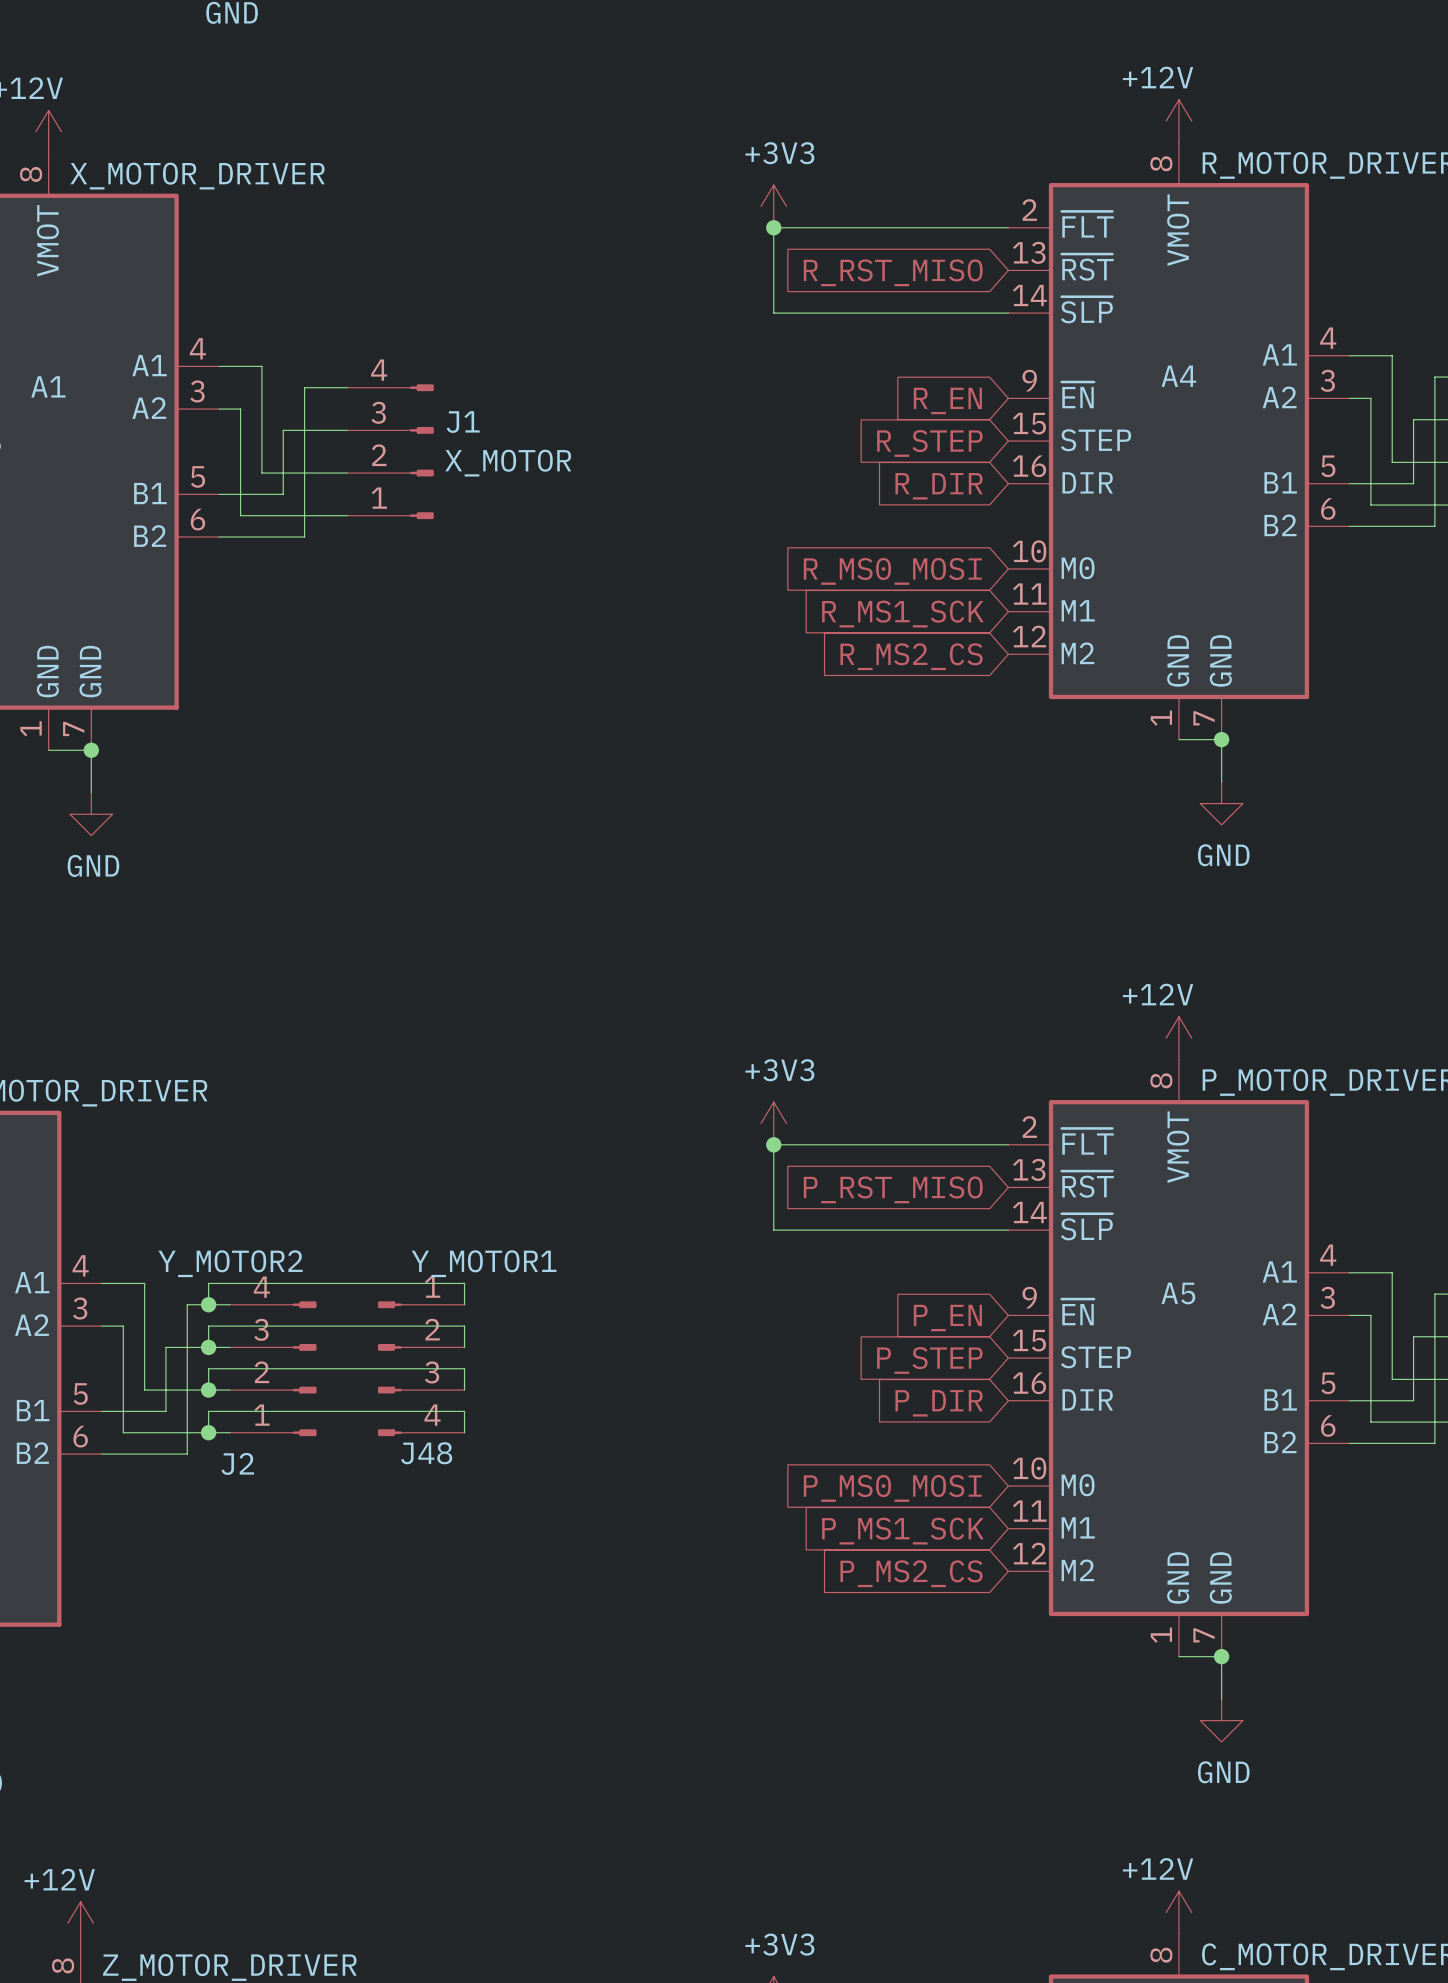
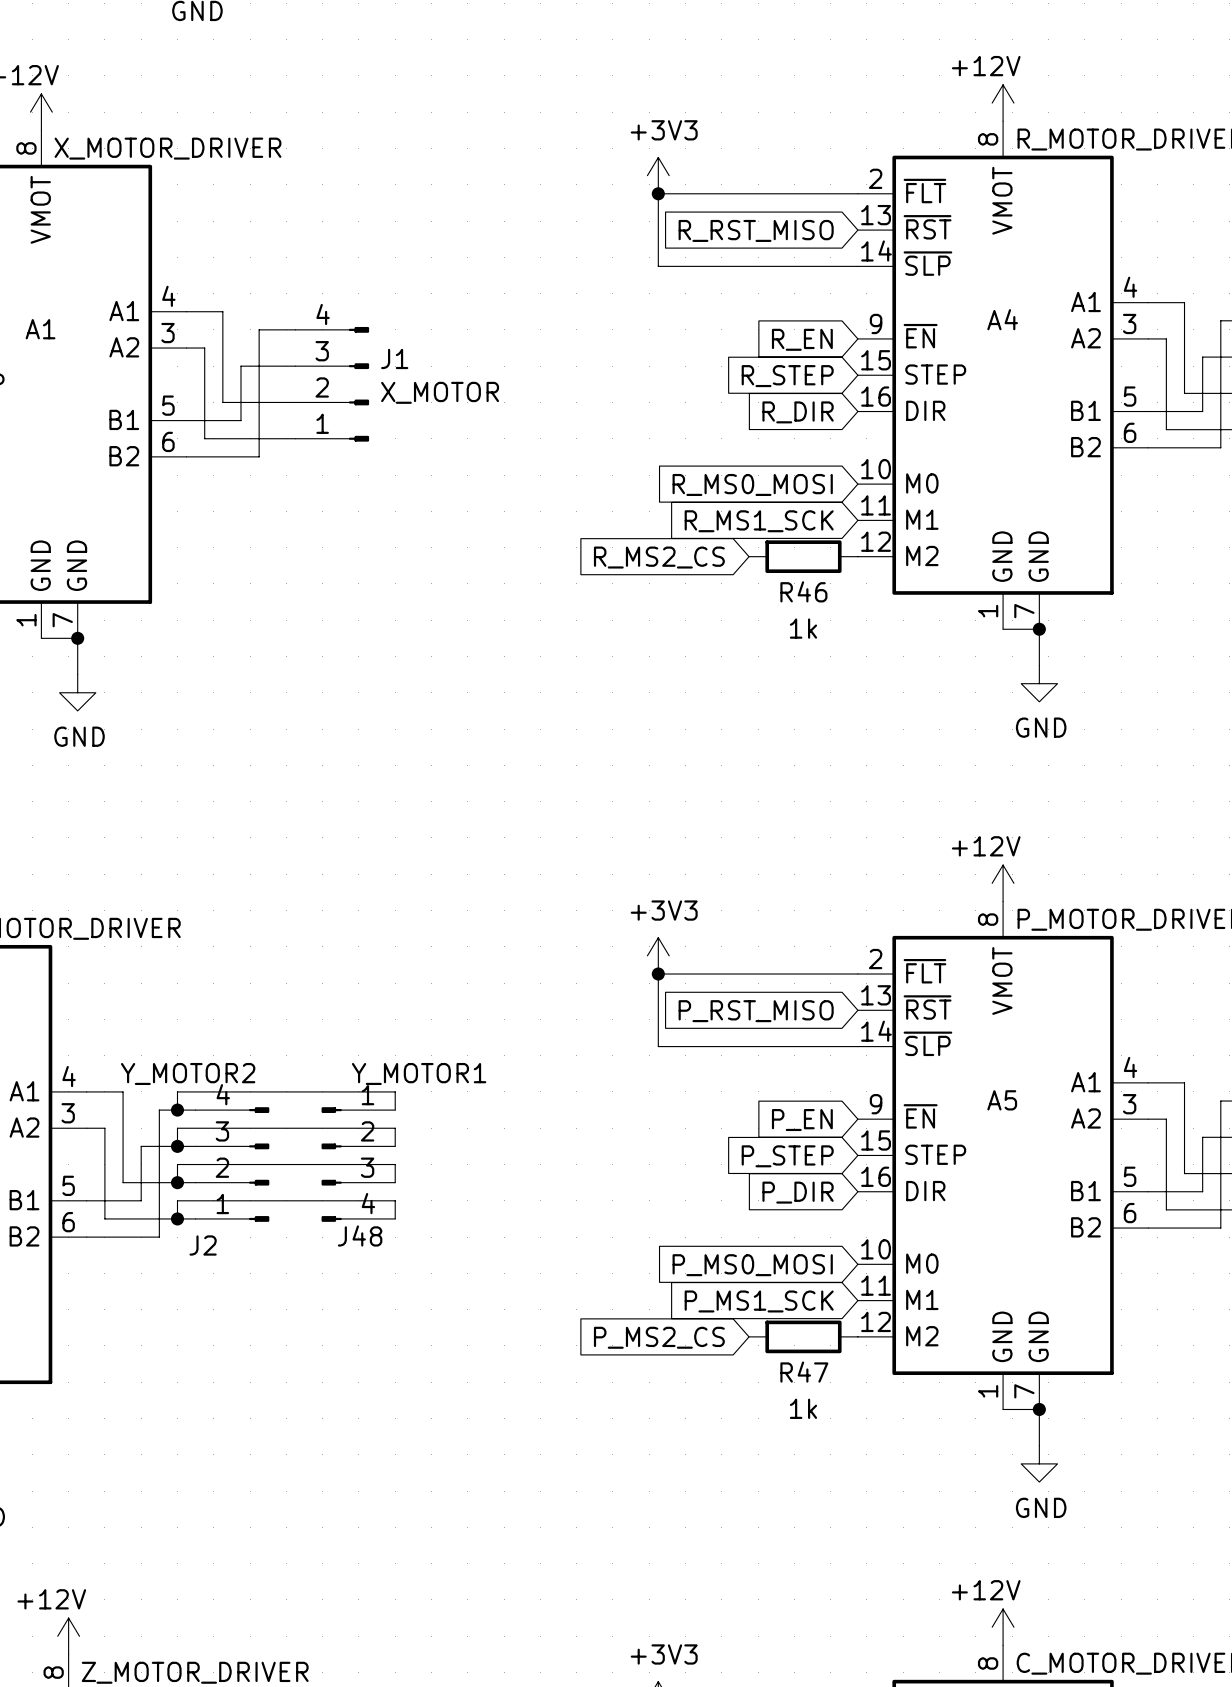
R46: none -> 1k (803, 556)
global label position: R_MS2_CS (911, 656) -> R_MS2_CS (659, 557)
R47: none -> 1k (803, 1336)
global label position: P_MS2_CS (911, 1573) -> P_MS2_CS (659, 1337)

